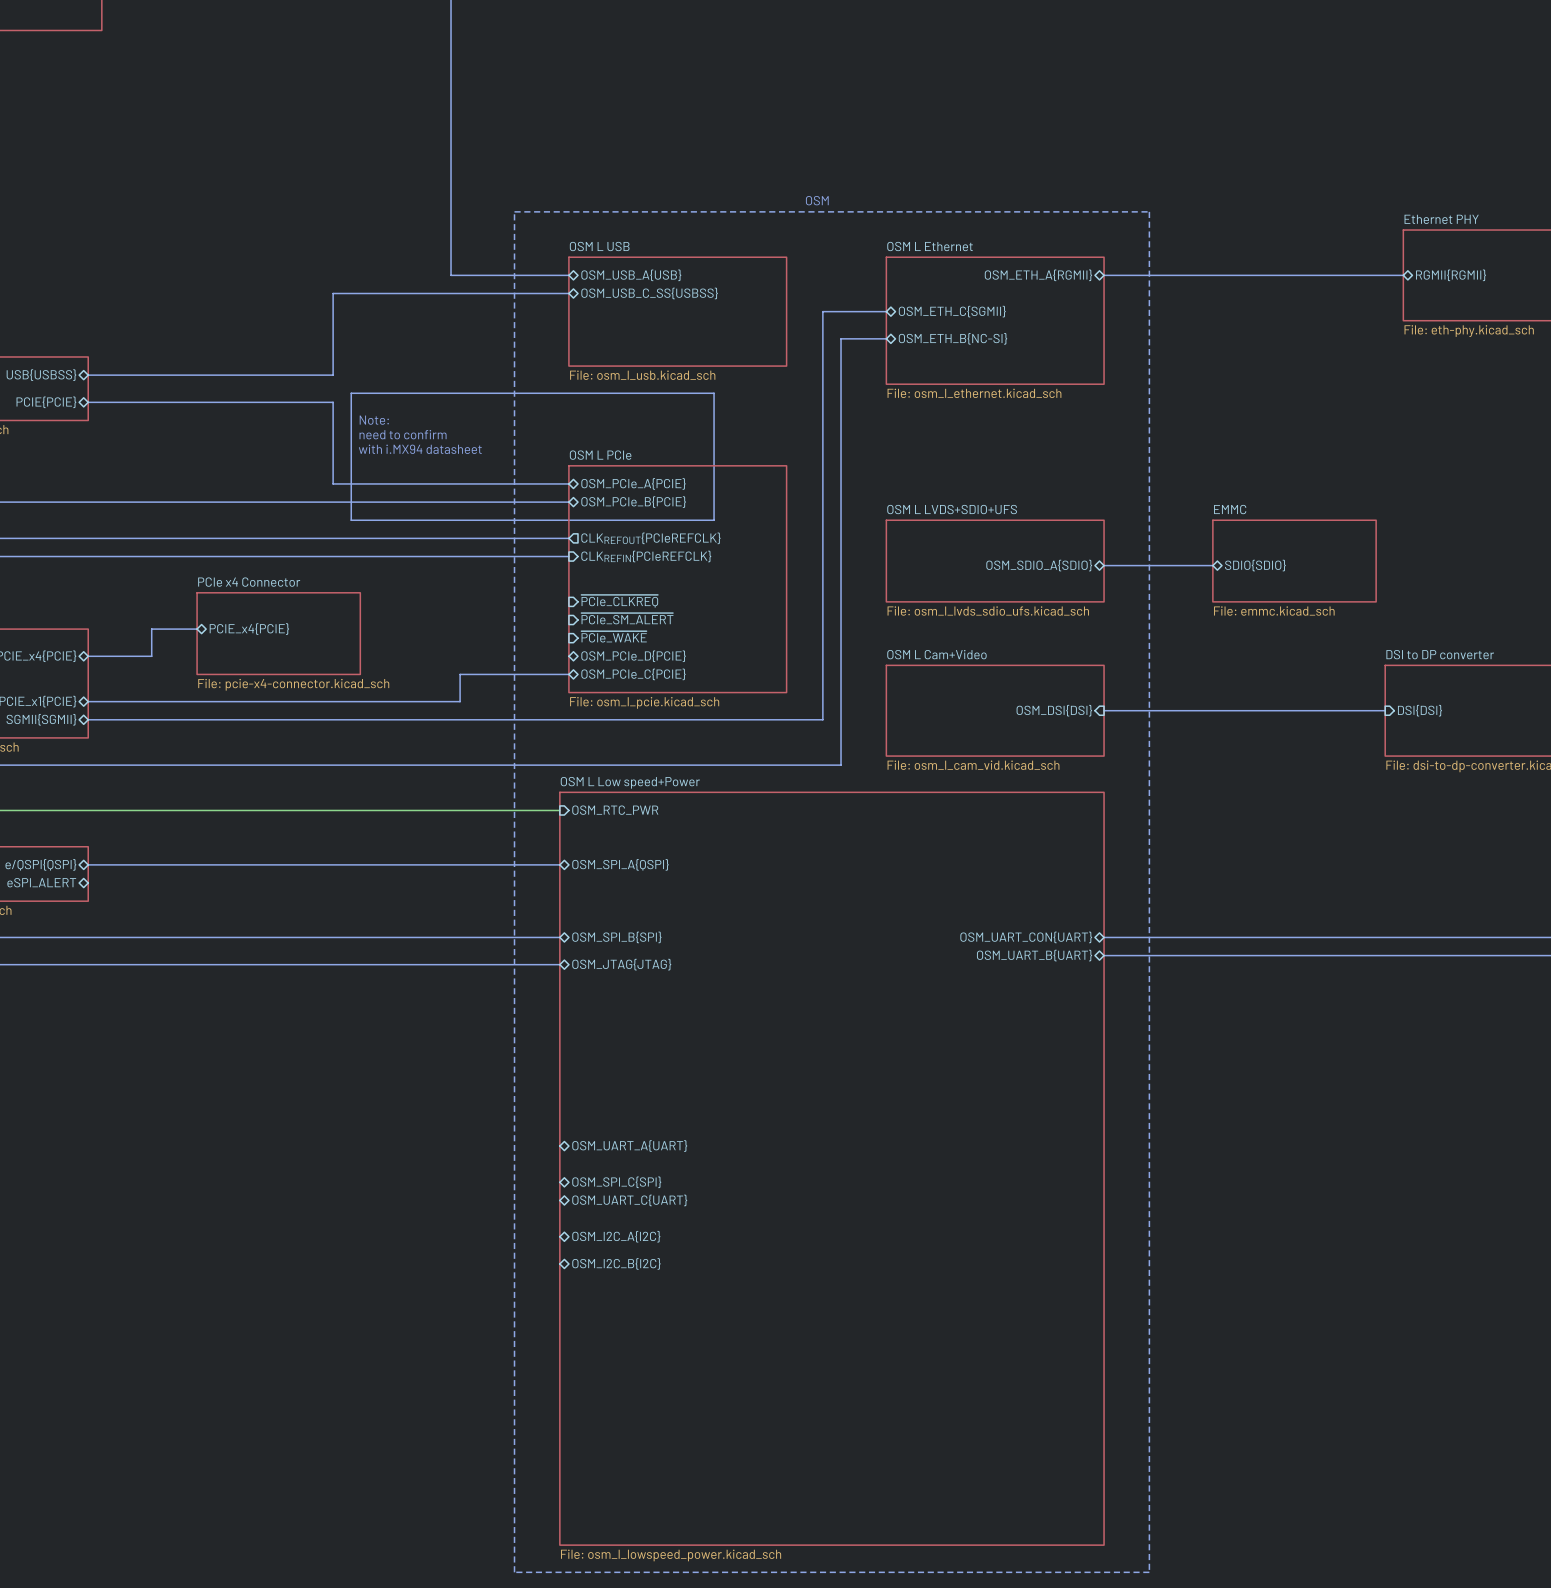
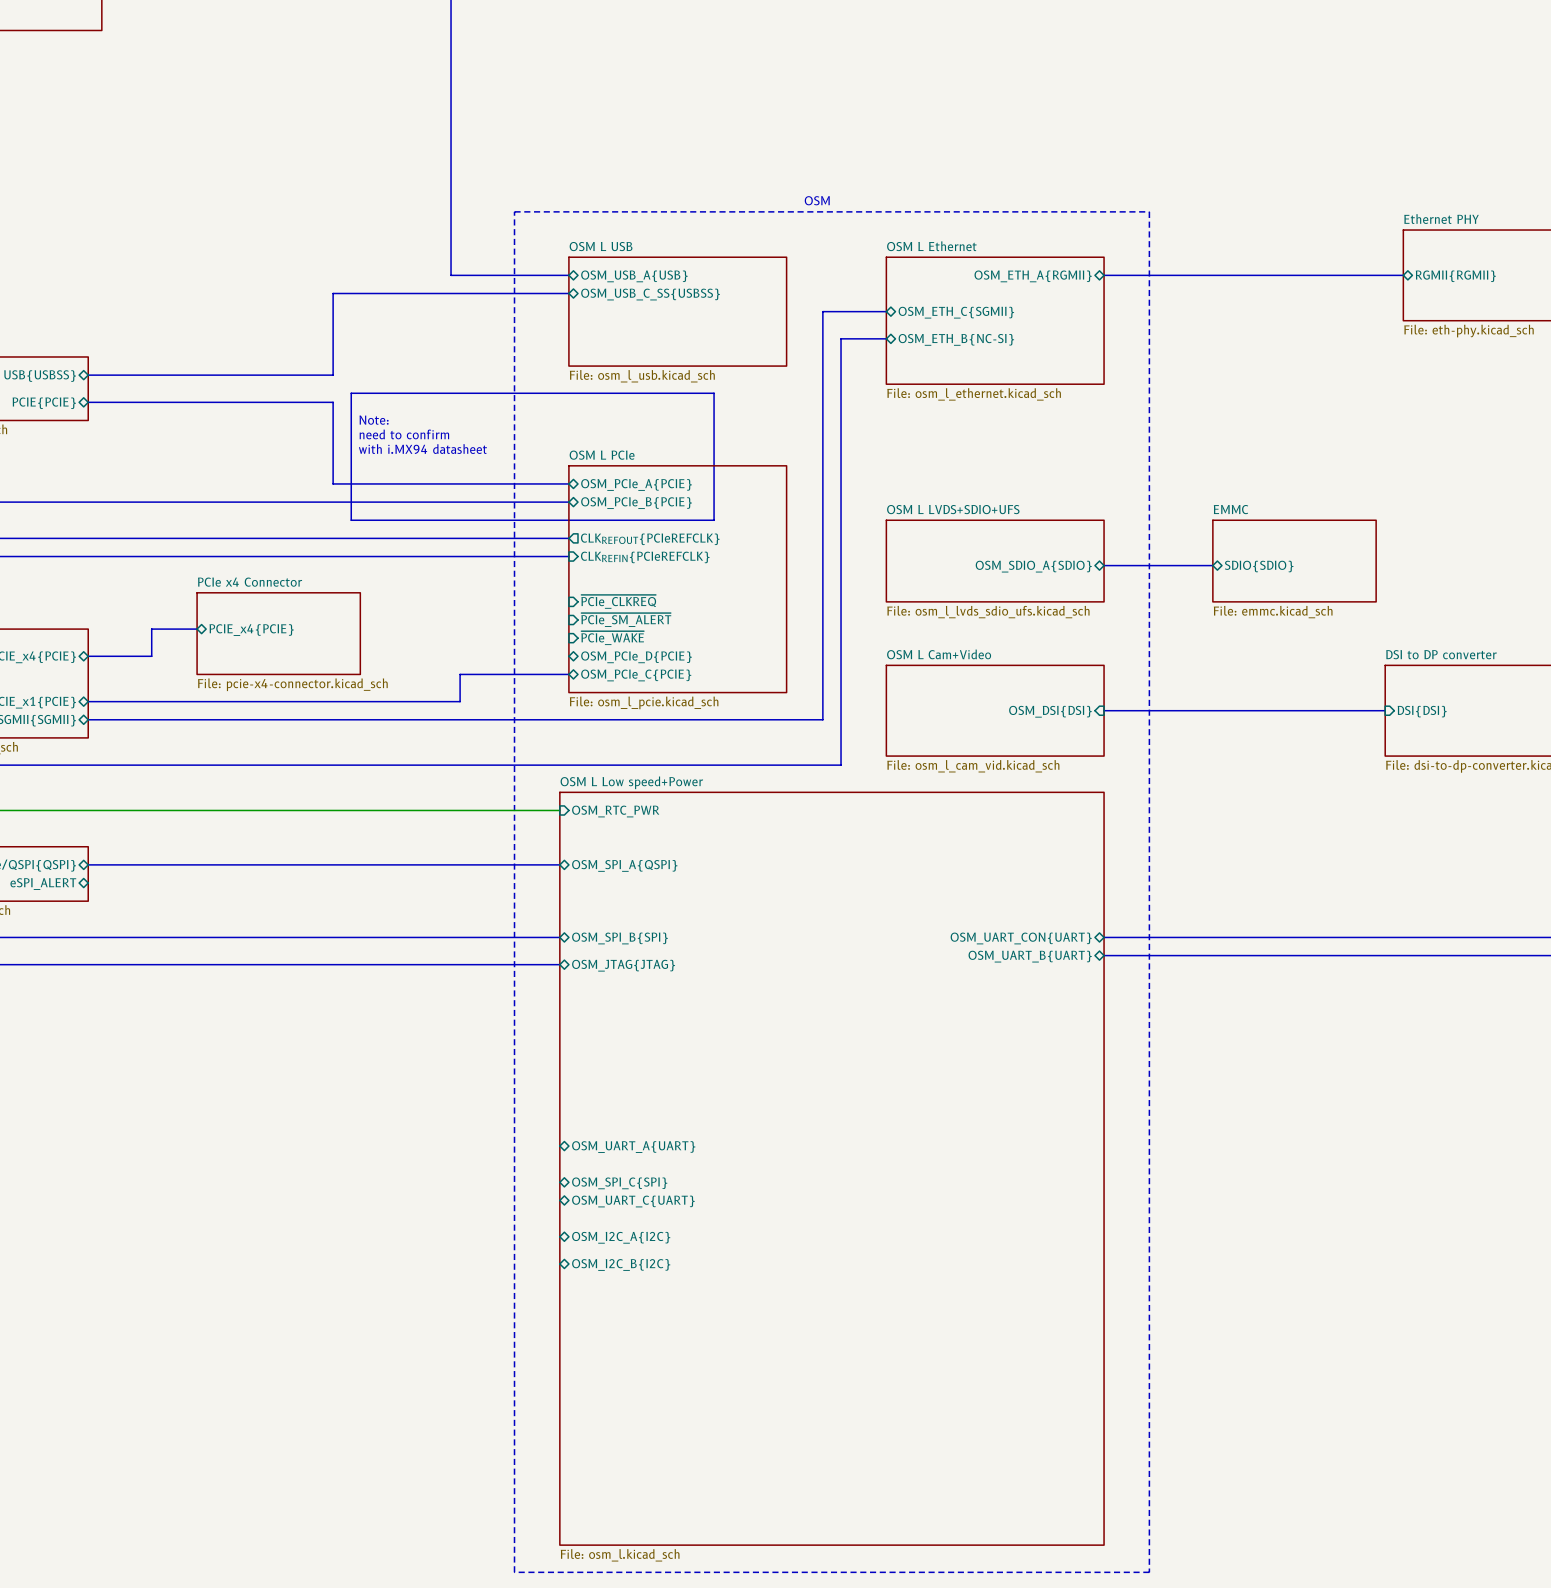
sheet OSM L Low speed+Power value: File: osm_l_lowspeed_power.kicad_sch (671, 1555) -> File: osm_l.kicad_sch (620, 1555)

